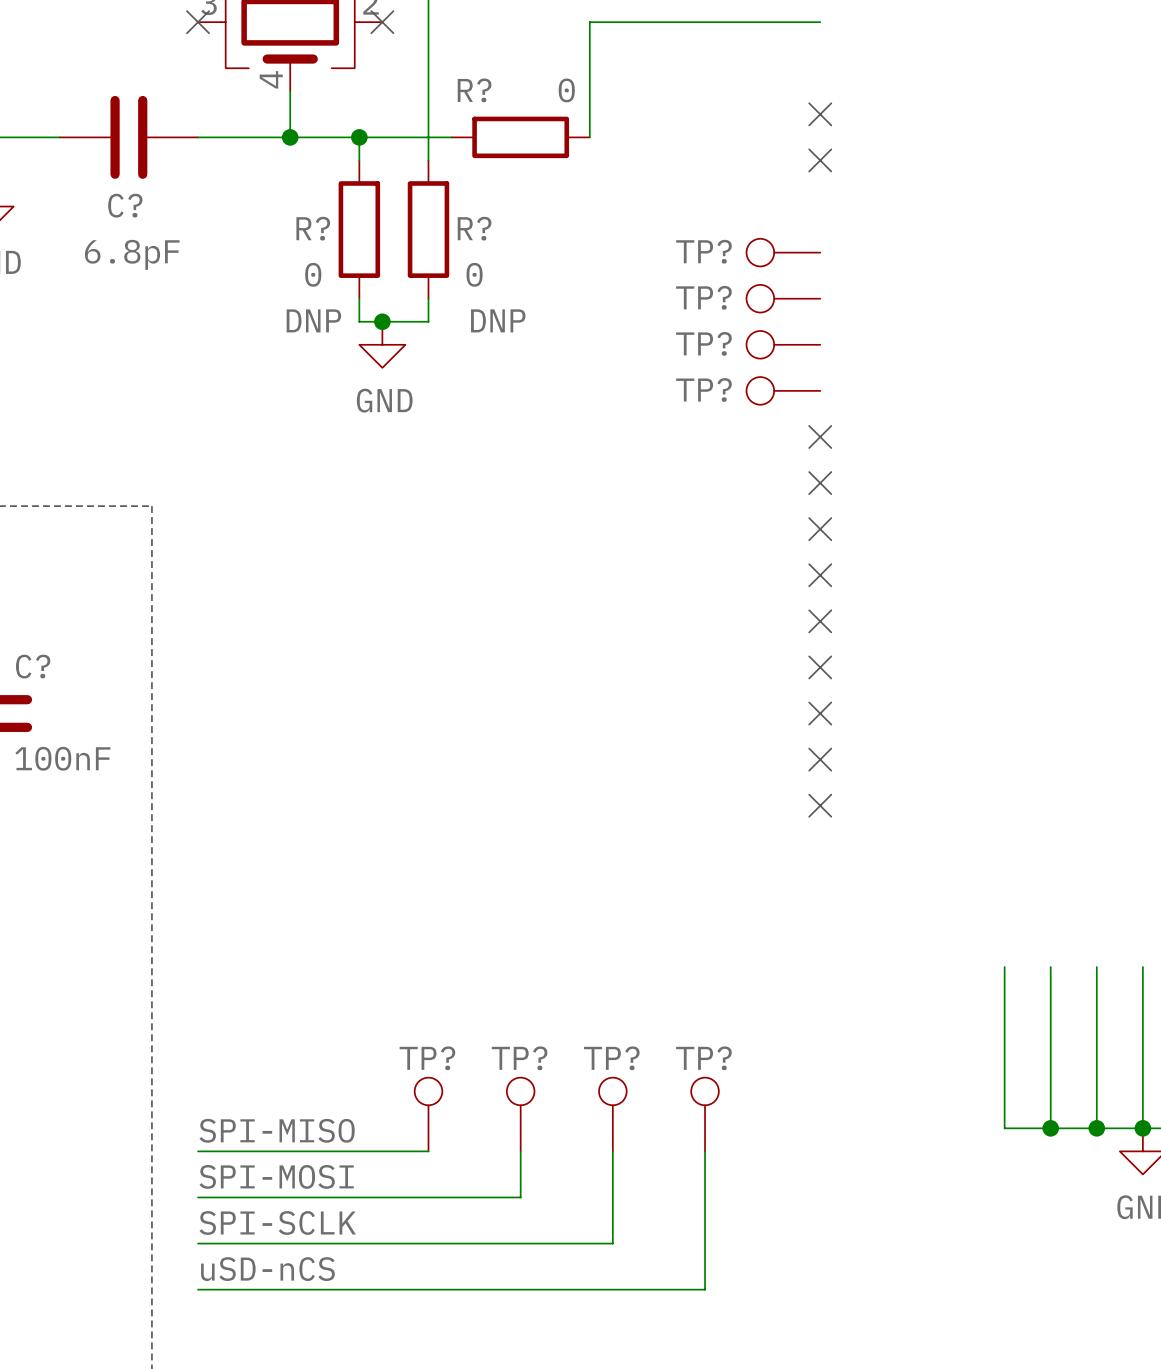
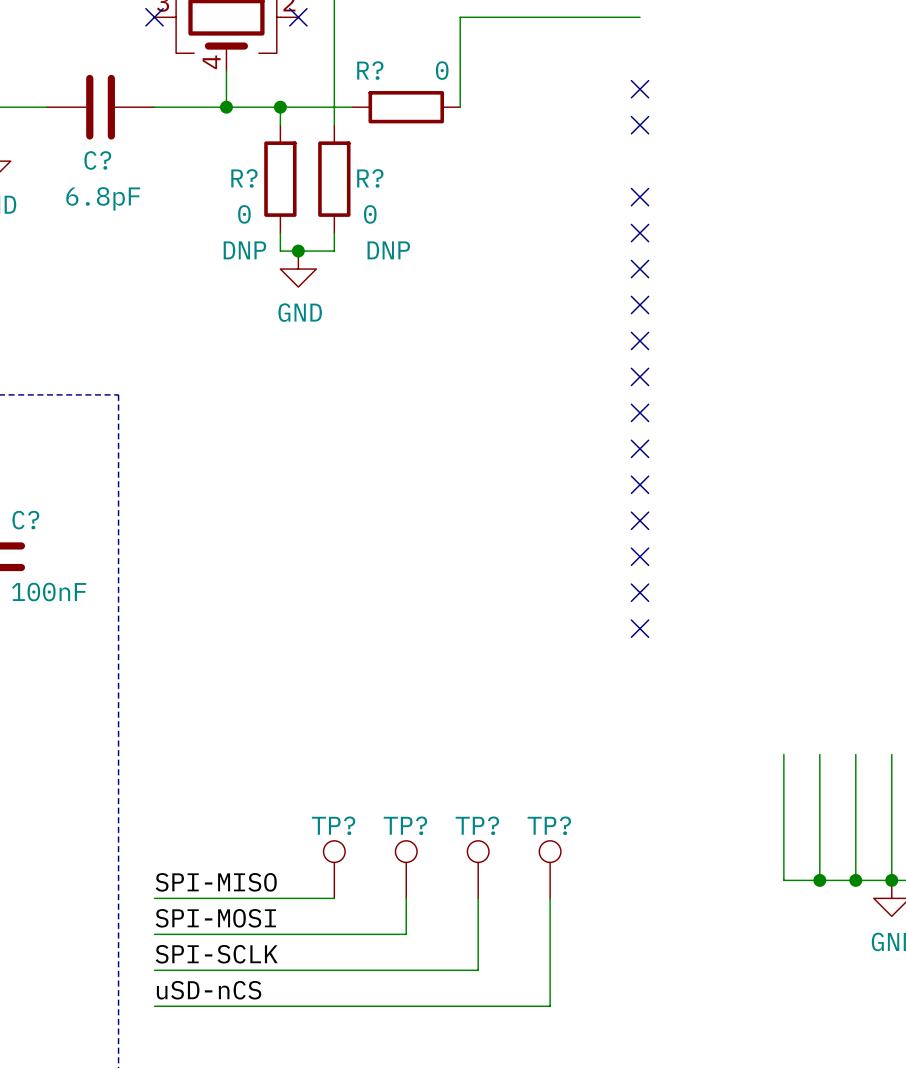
TP?: (783, 252) -> none
no-connect mark: none -> (640, 197)
TP?: (783, 298) -> none
no-connect mark: none -> (640, 233)
TP?: (783, 344) -> none
no-connect mark: none -> (640, 269)
TP?: (783, 390) -> none
no-connect mark: none -> (640, 304)

